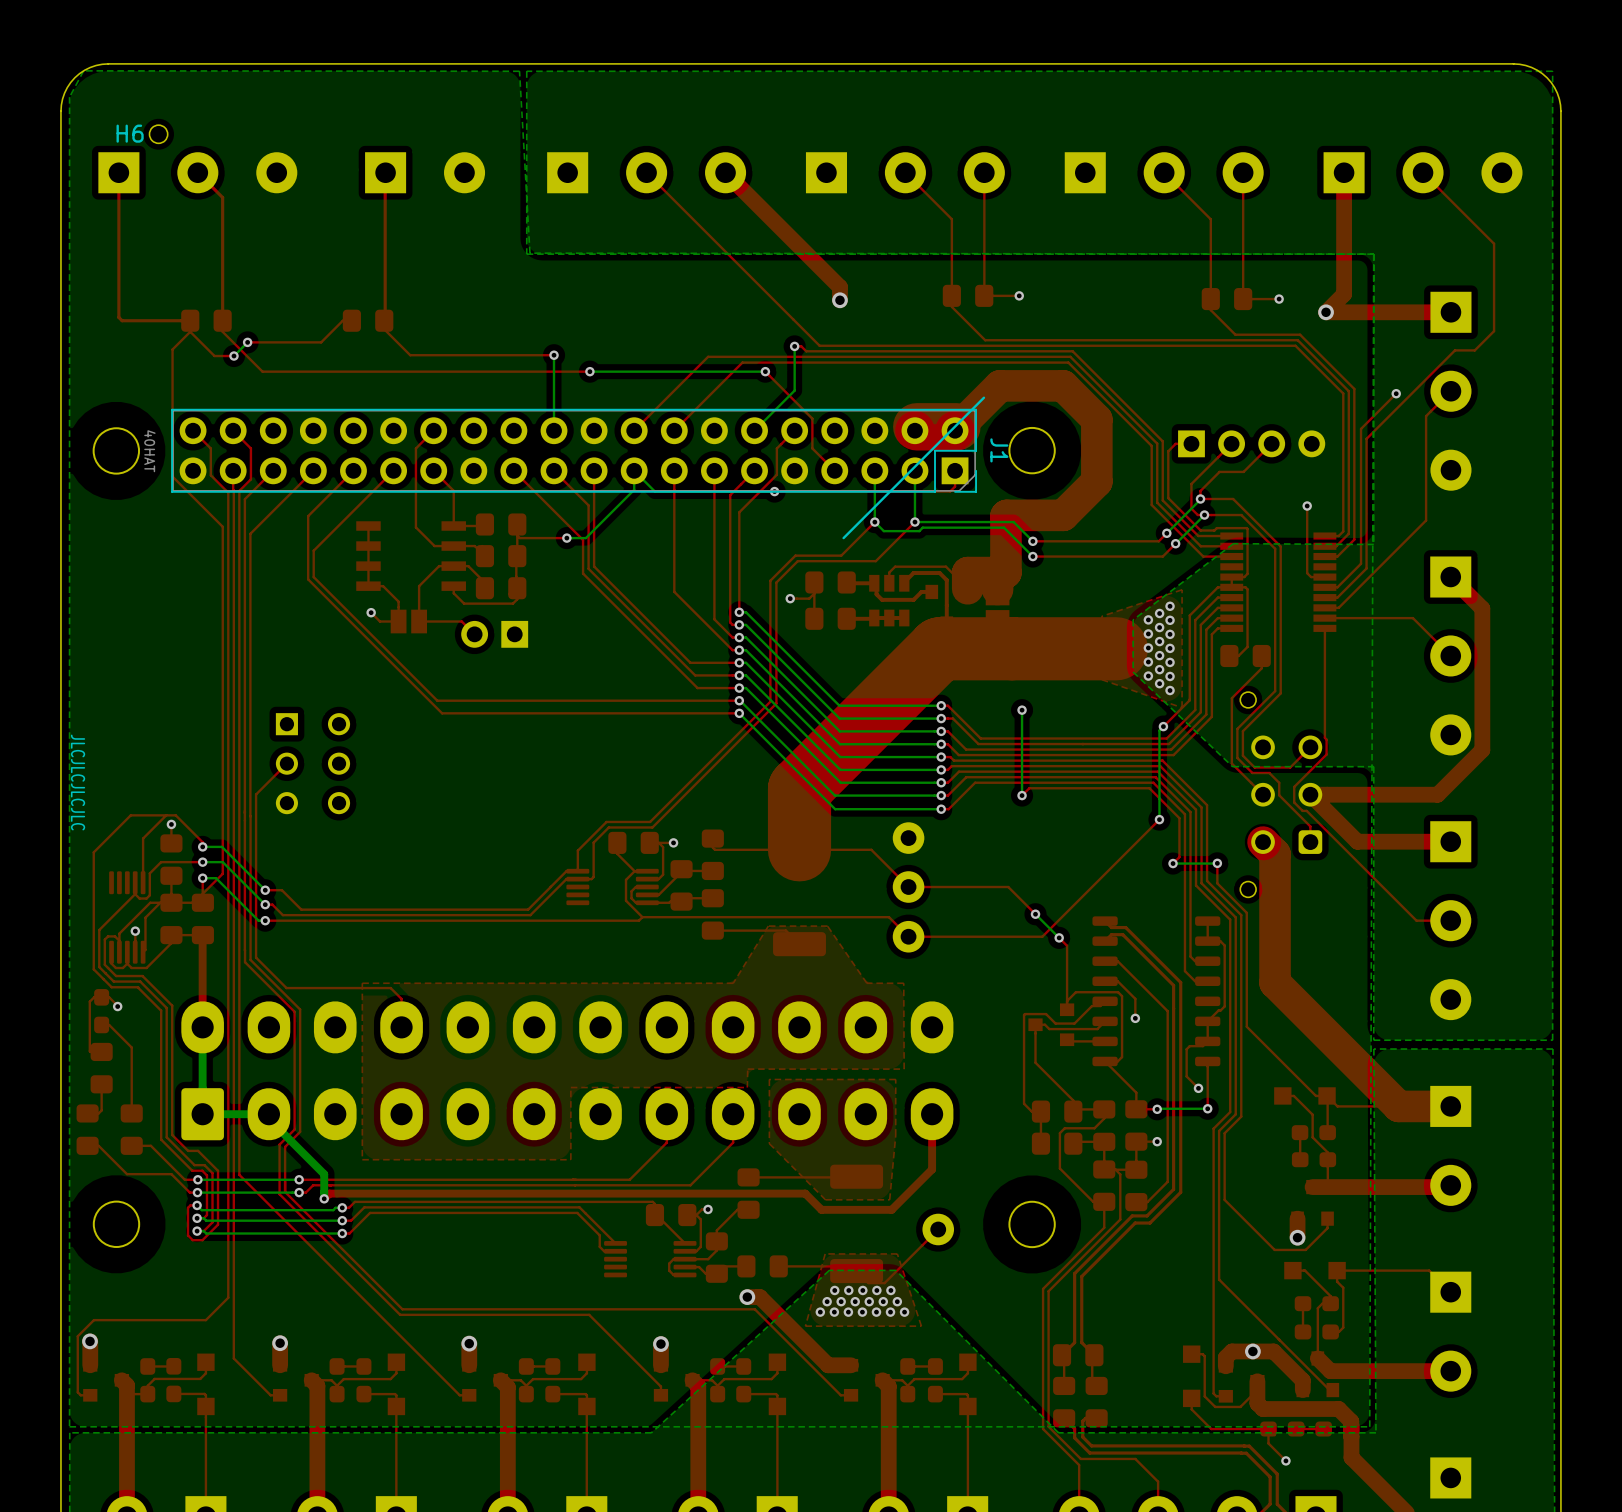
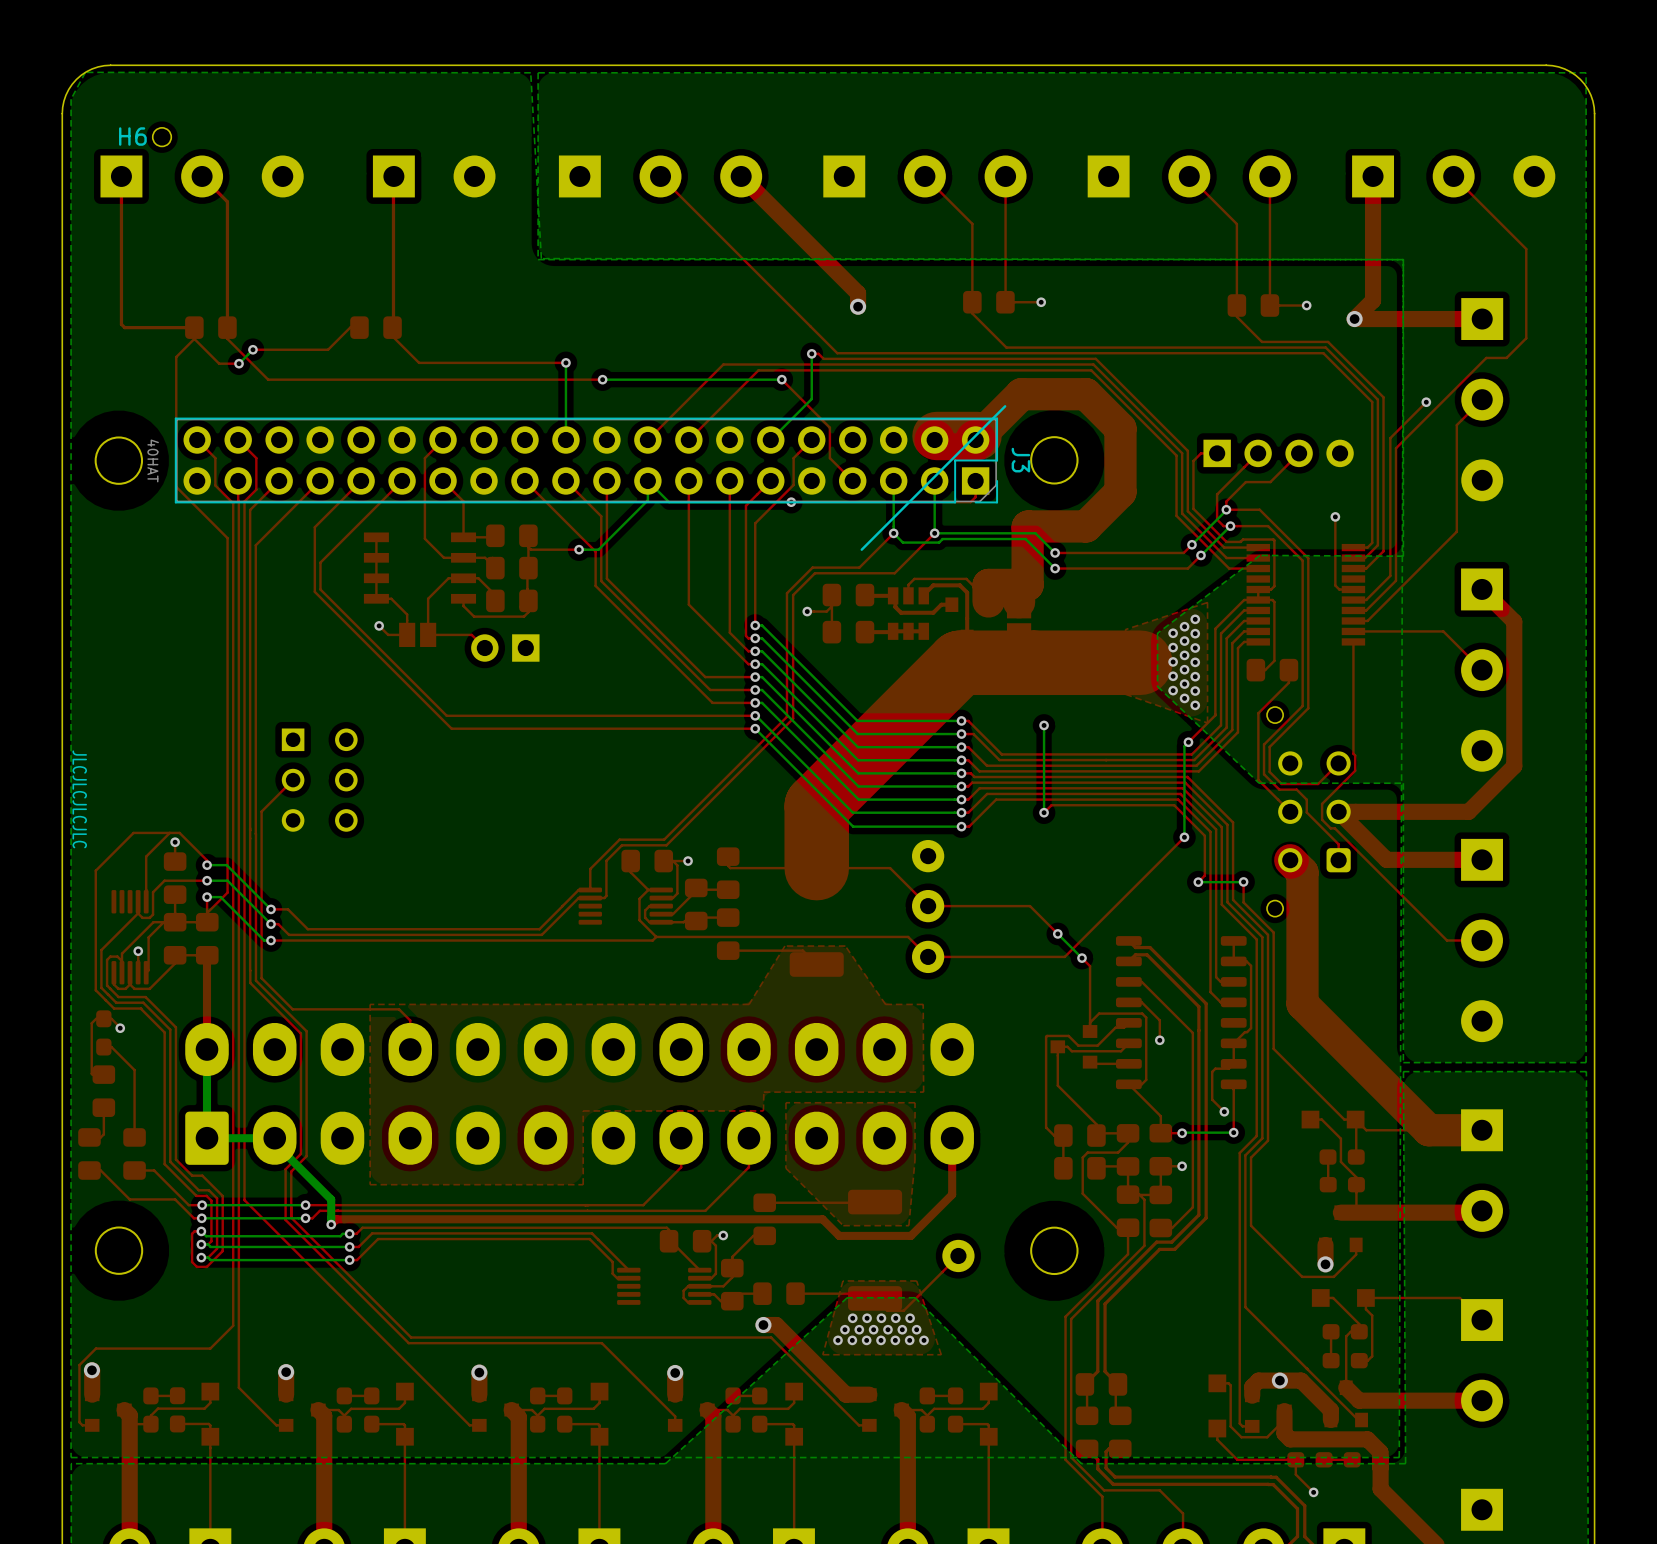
J1 name: J1 (999, 450) -> J3 (1020, 460)

